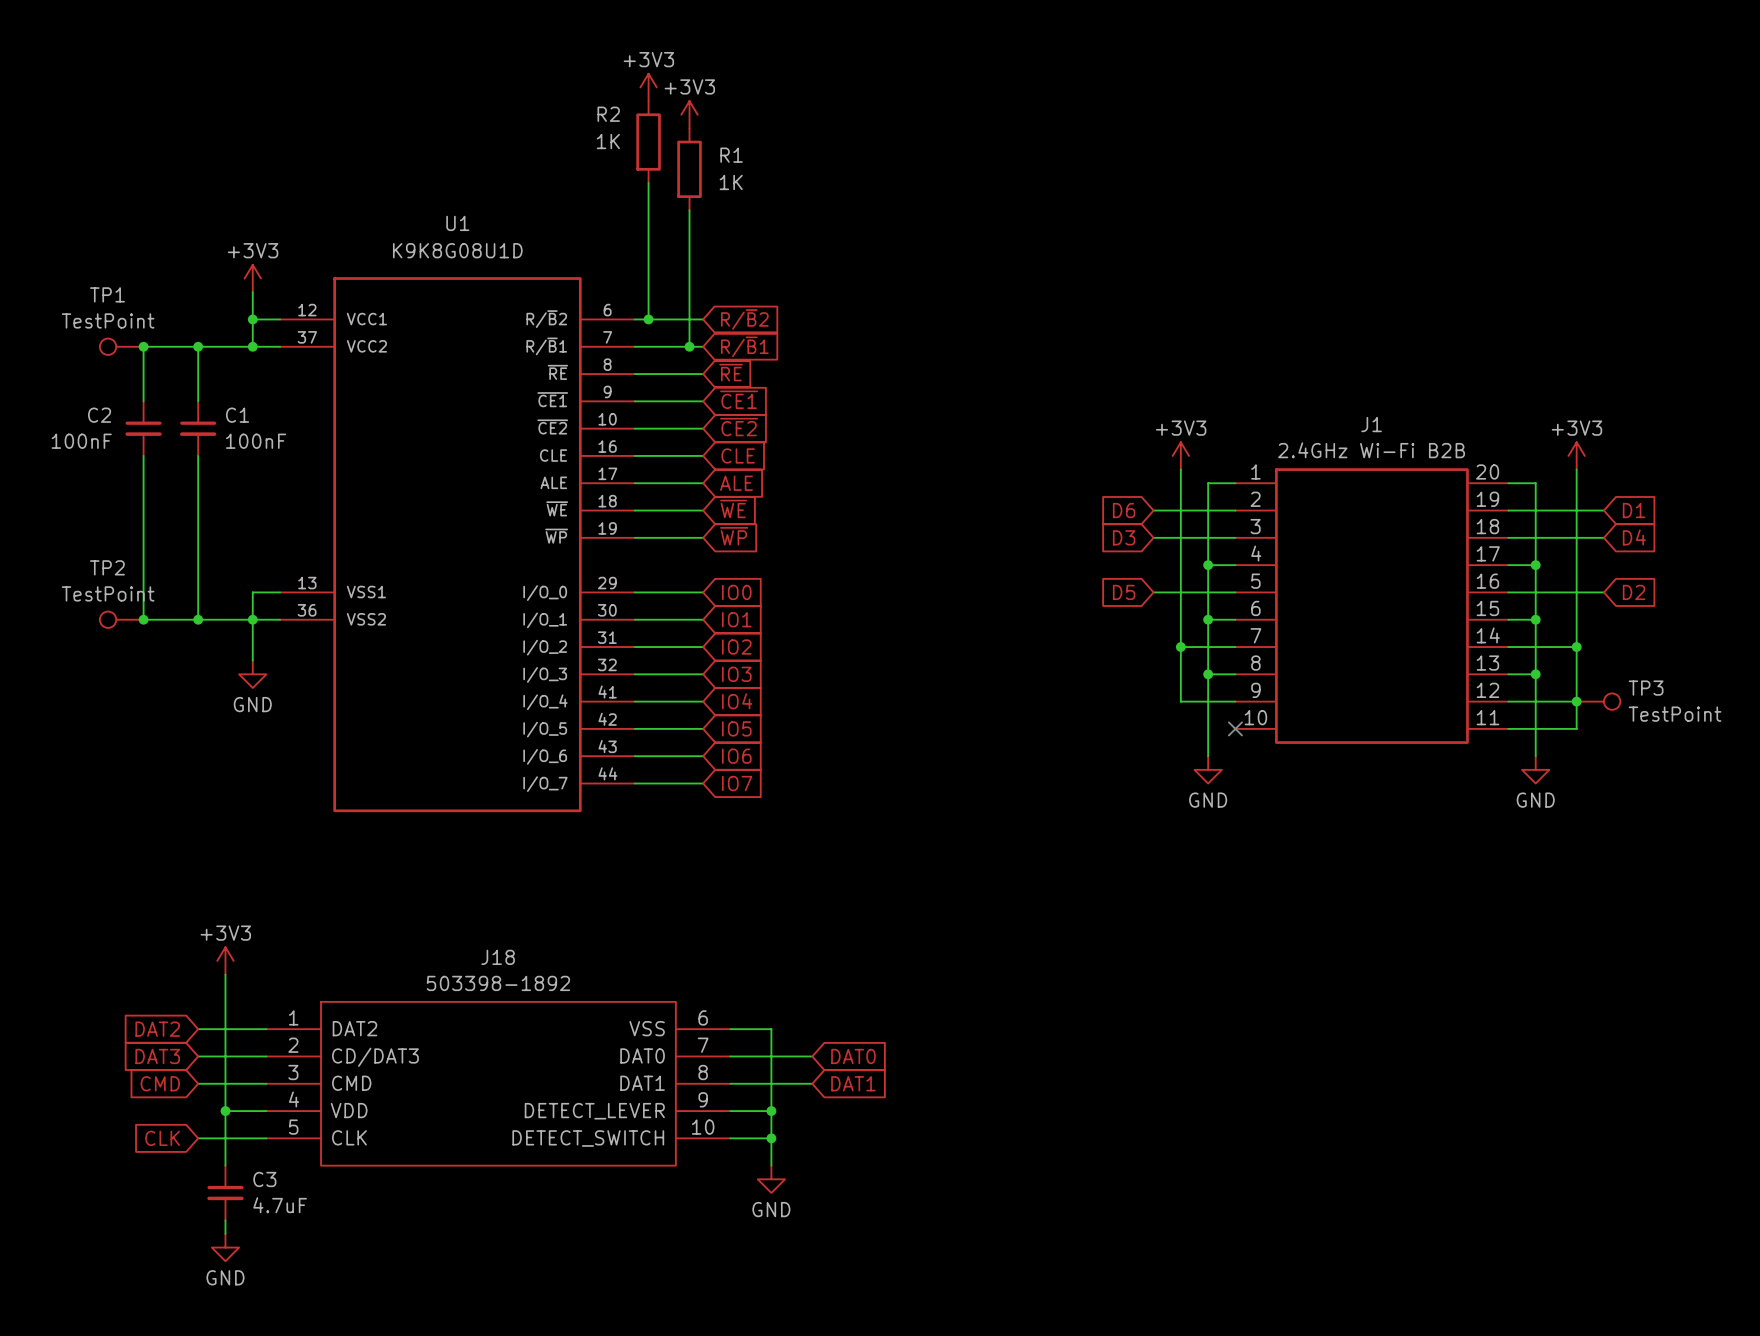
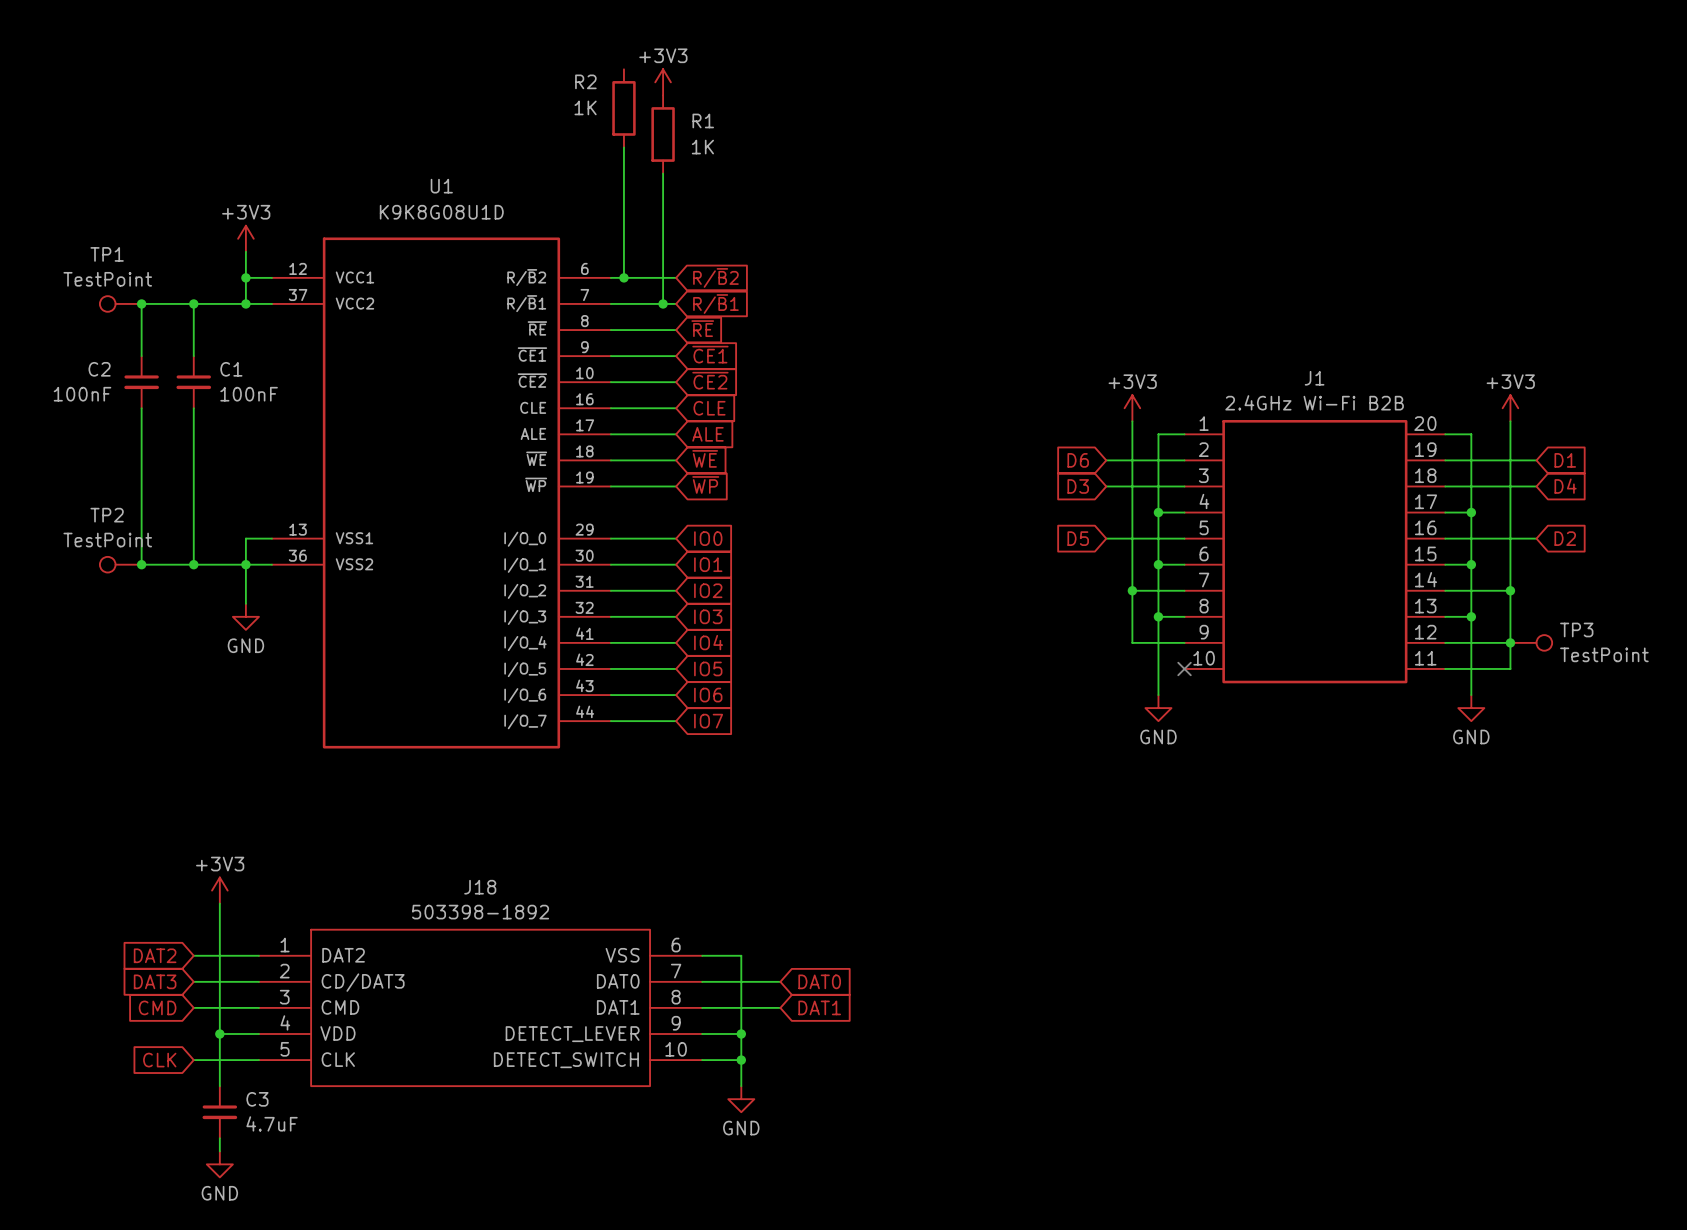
power symbol: +3V3 (648, 87) -> none

